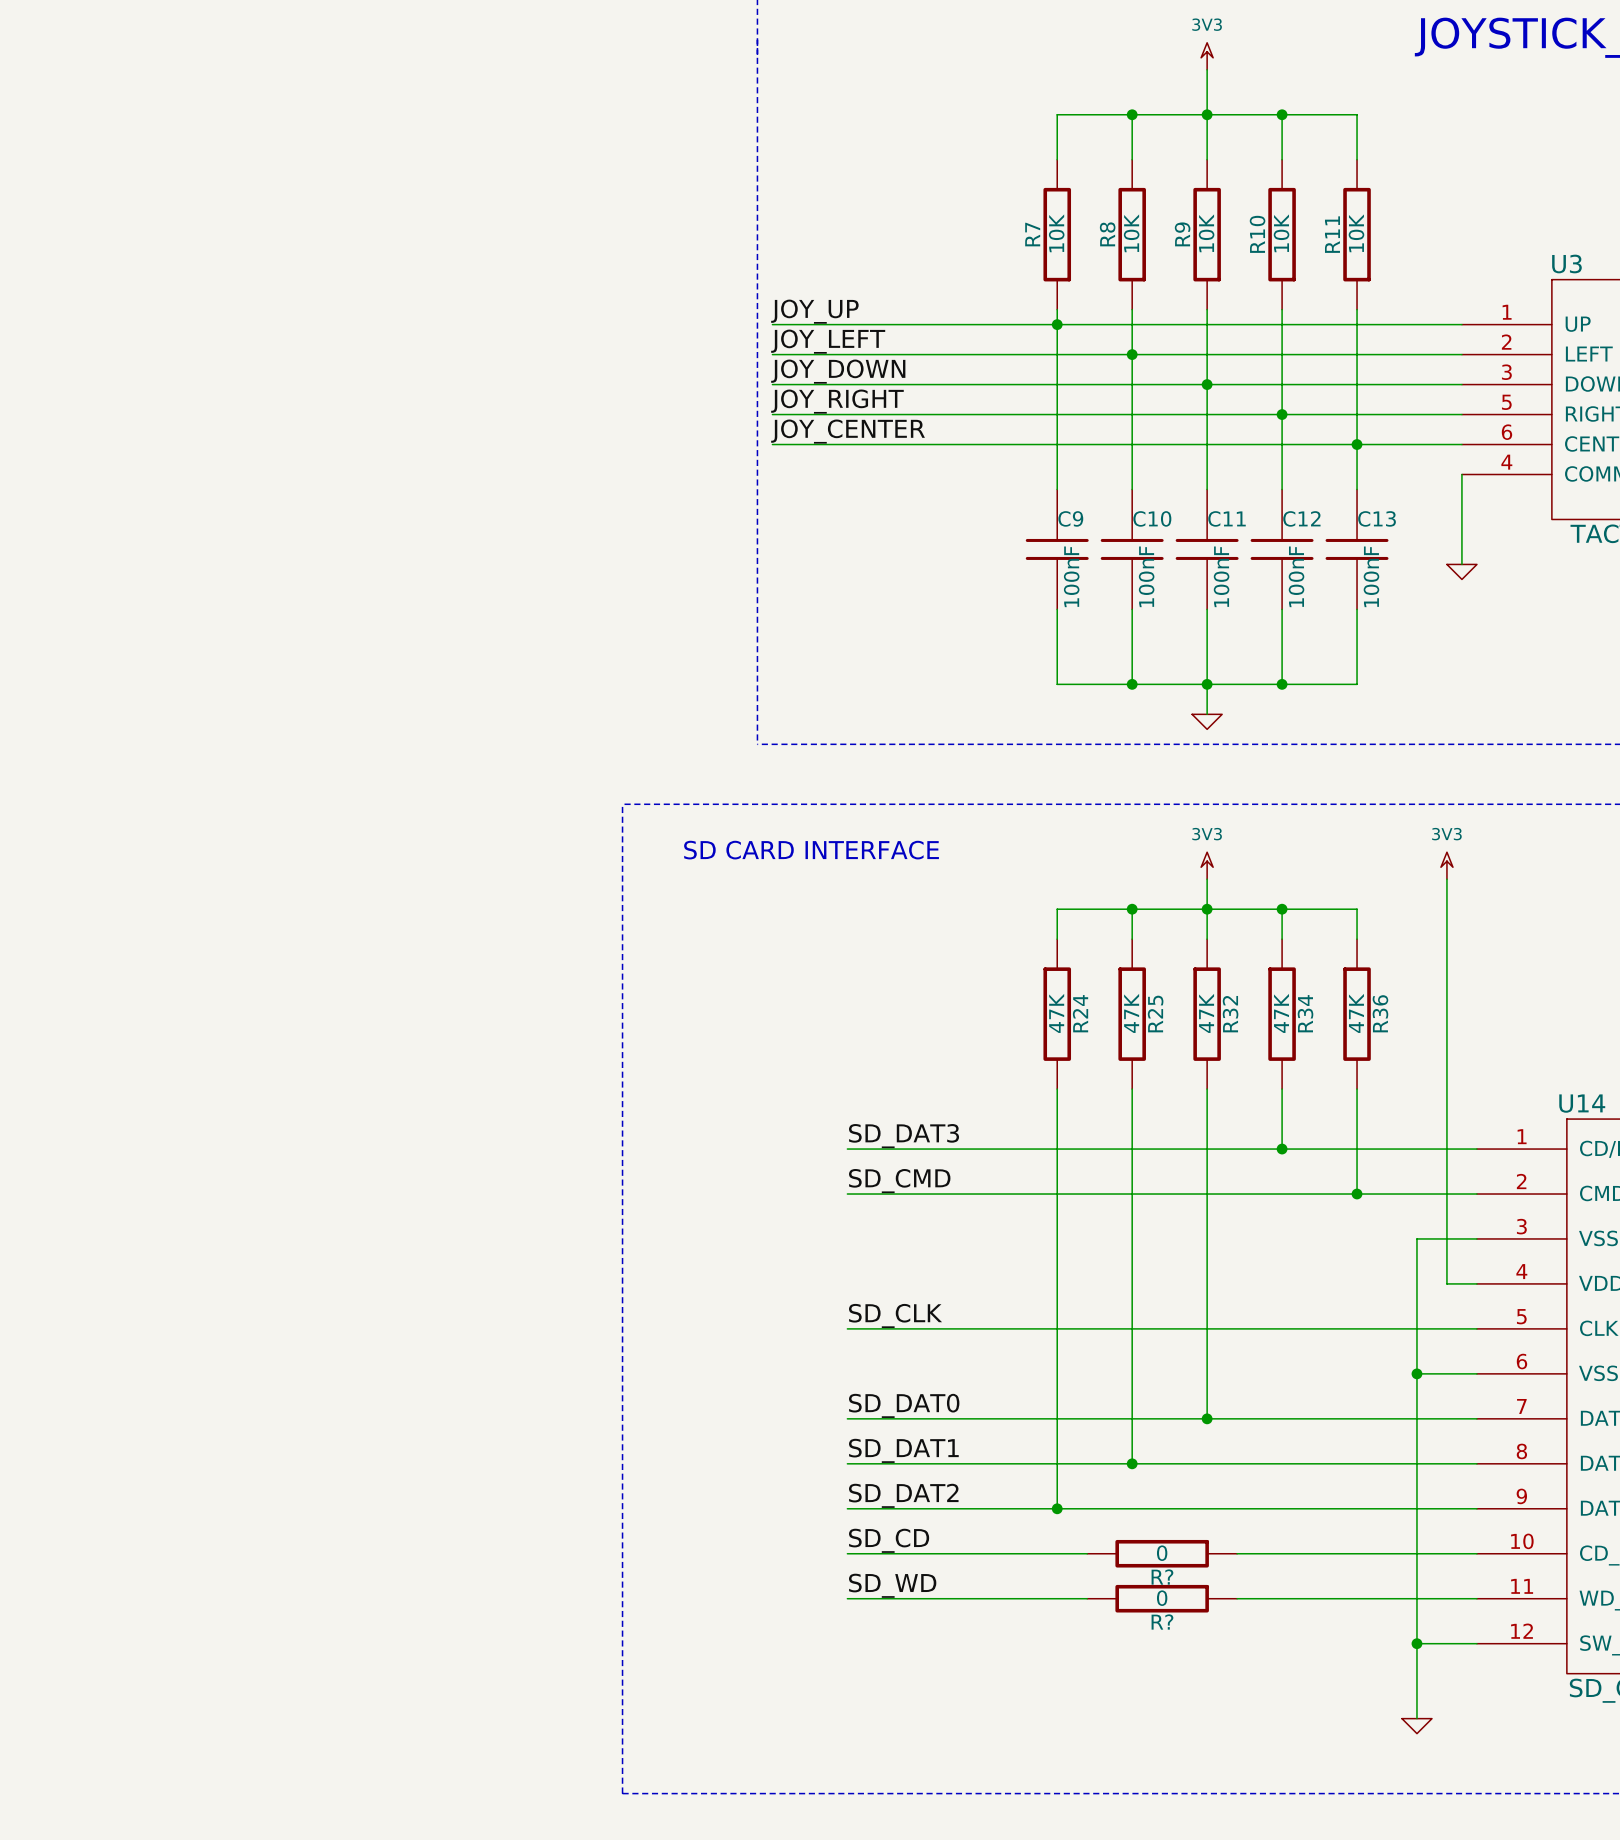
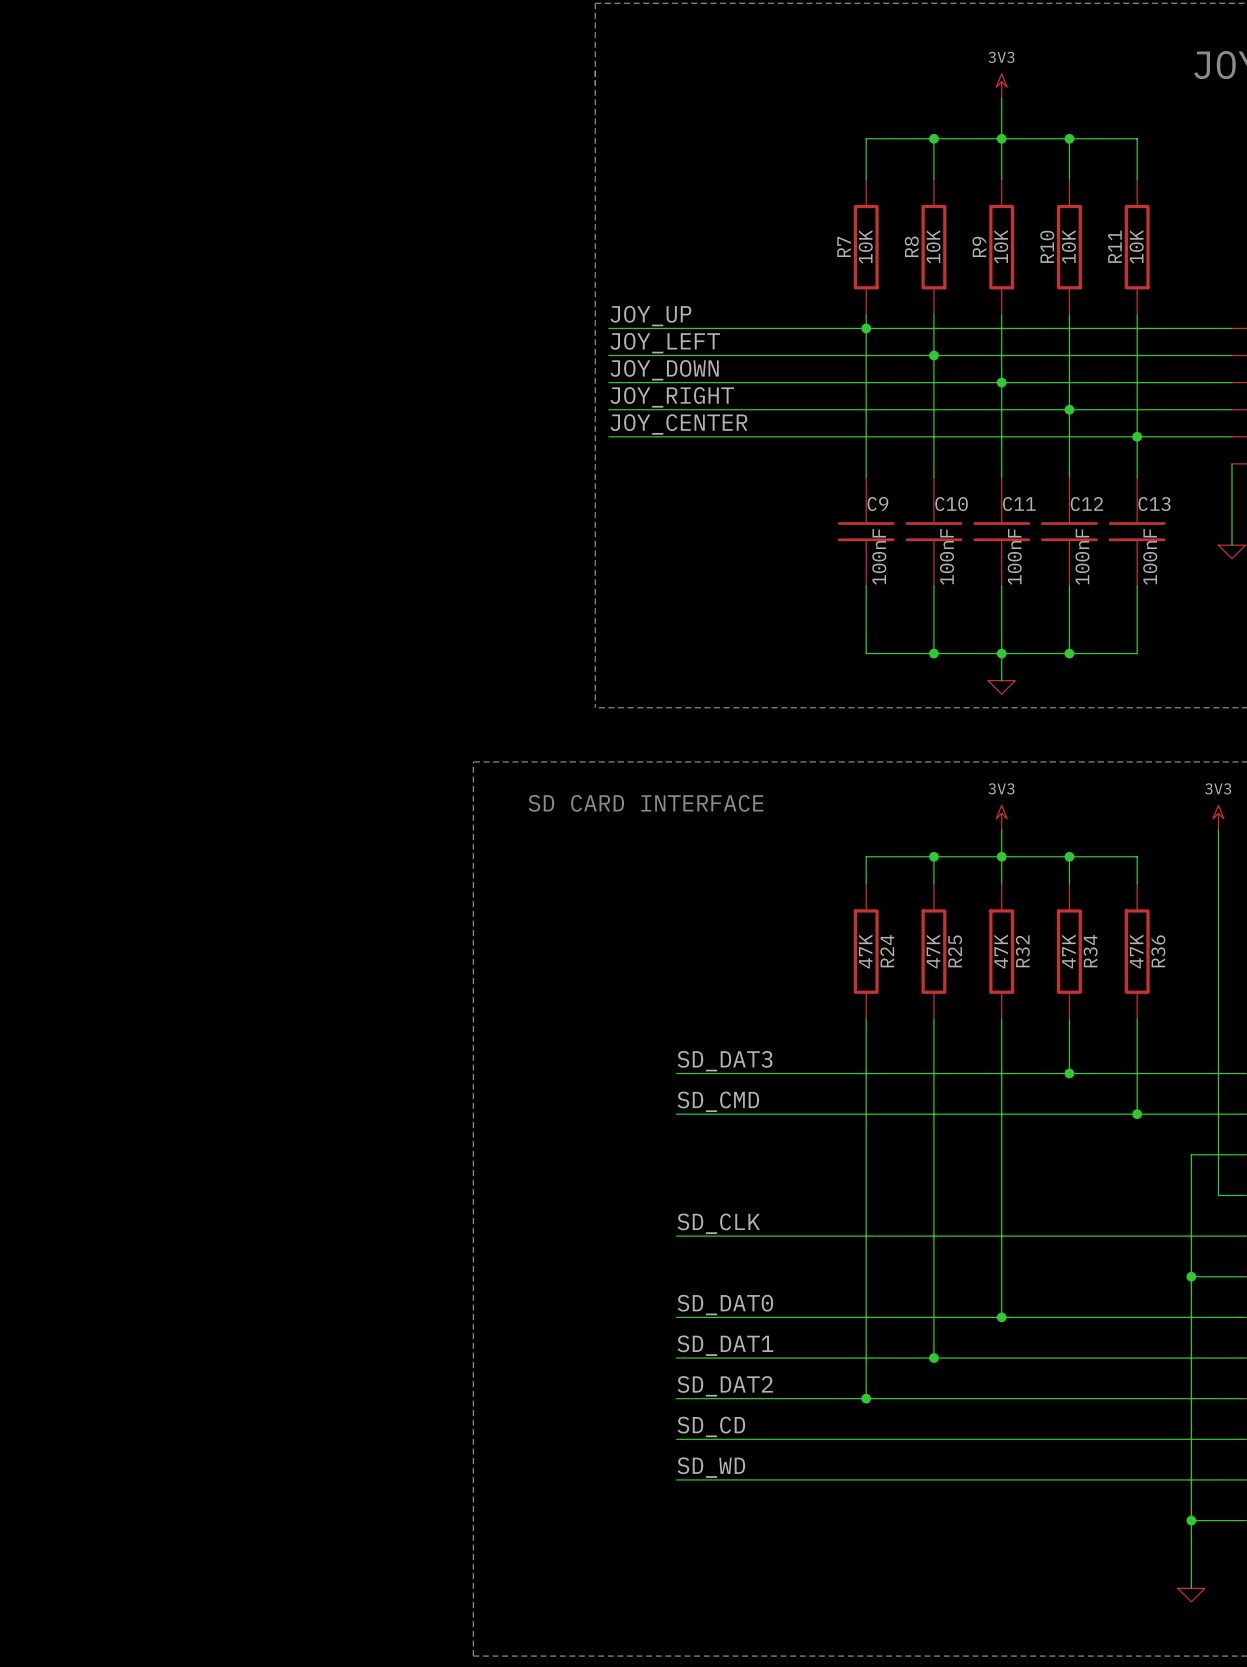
wire: none -> (893, 1439) (1028, 1439)
R?: 0 (1162, 1553) -> none
wire: none -> (893, 1479) (1028, 1479)
R?: 0 (1162, 1598) -> none

